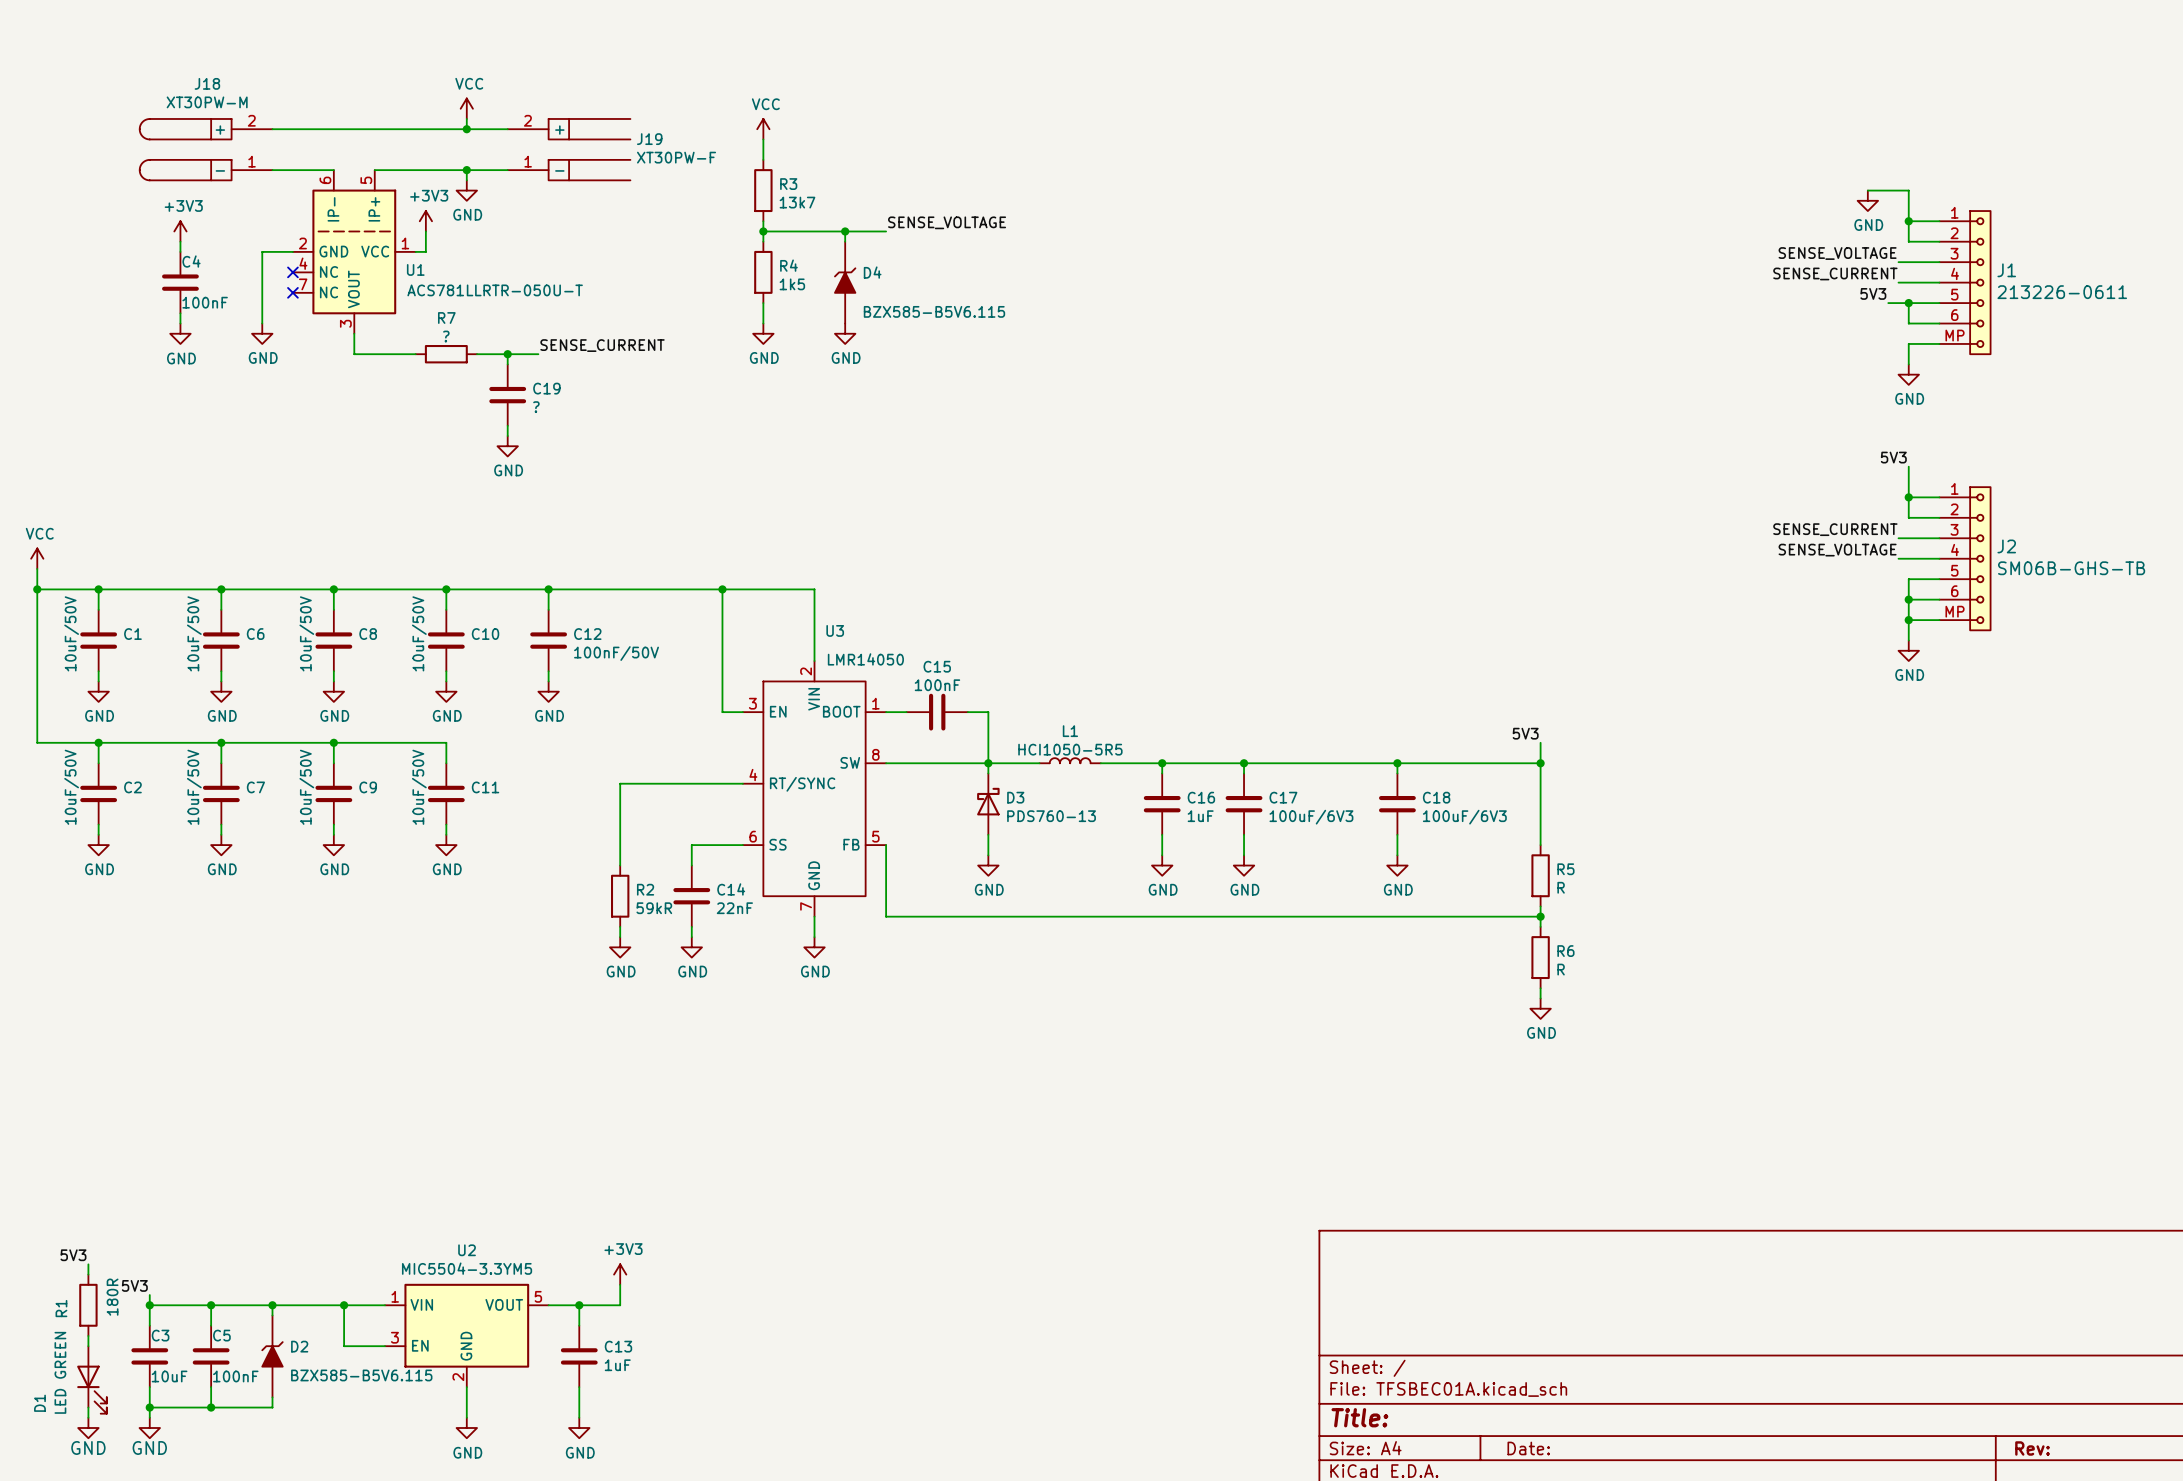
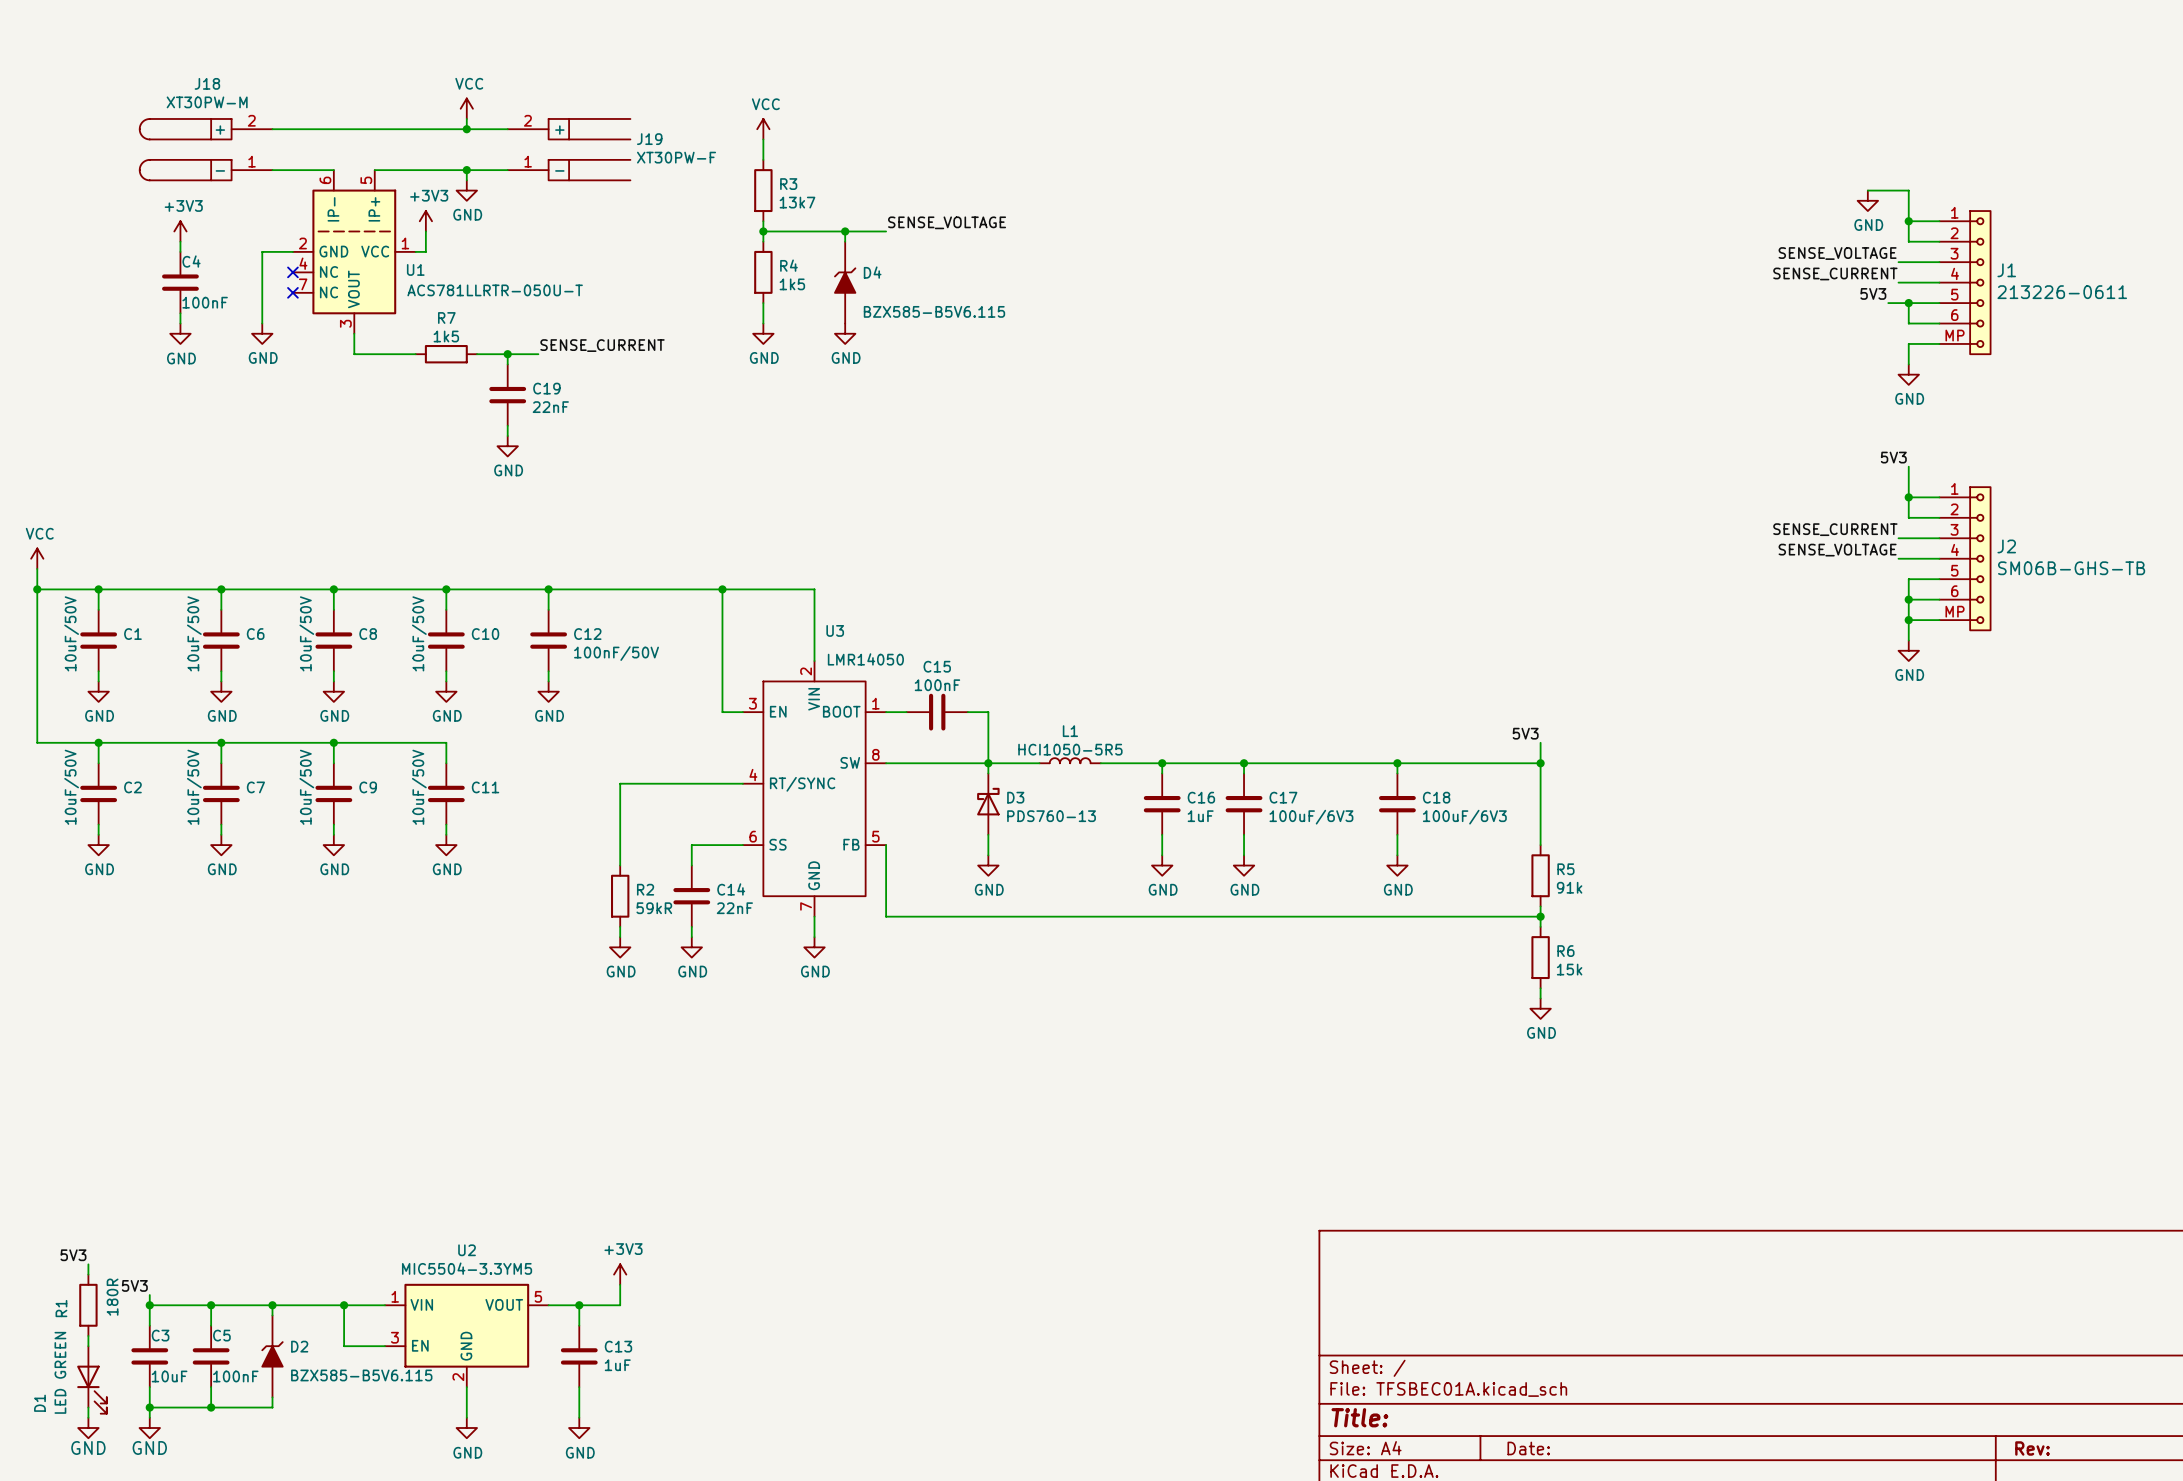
R7 value: ? (446, 336) -> 1k5 (446, 336)
C19 value: ? (536, 407) -> 22nF (550, 407)
R5 value: R (1561, 887) -> 91k (1569, 887)
R6 value: R (1561, 969) -> 15k (1569, 969)

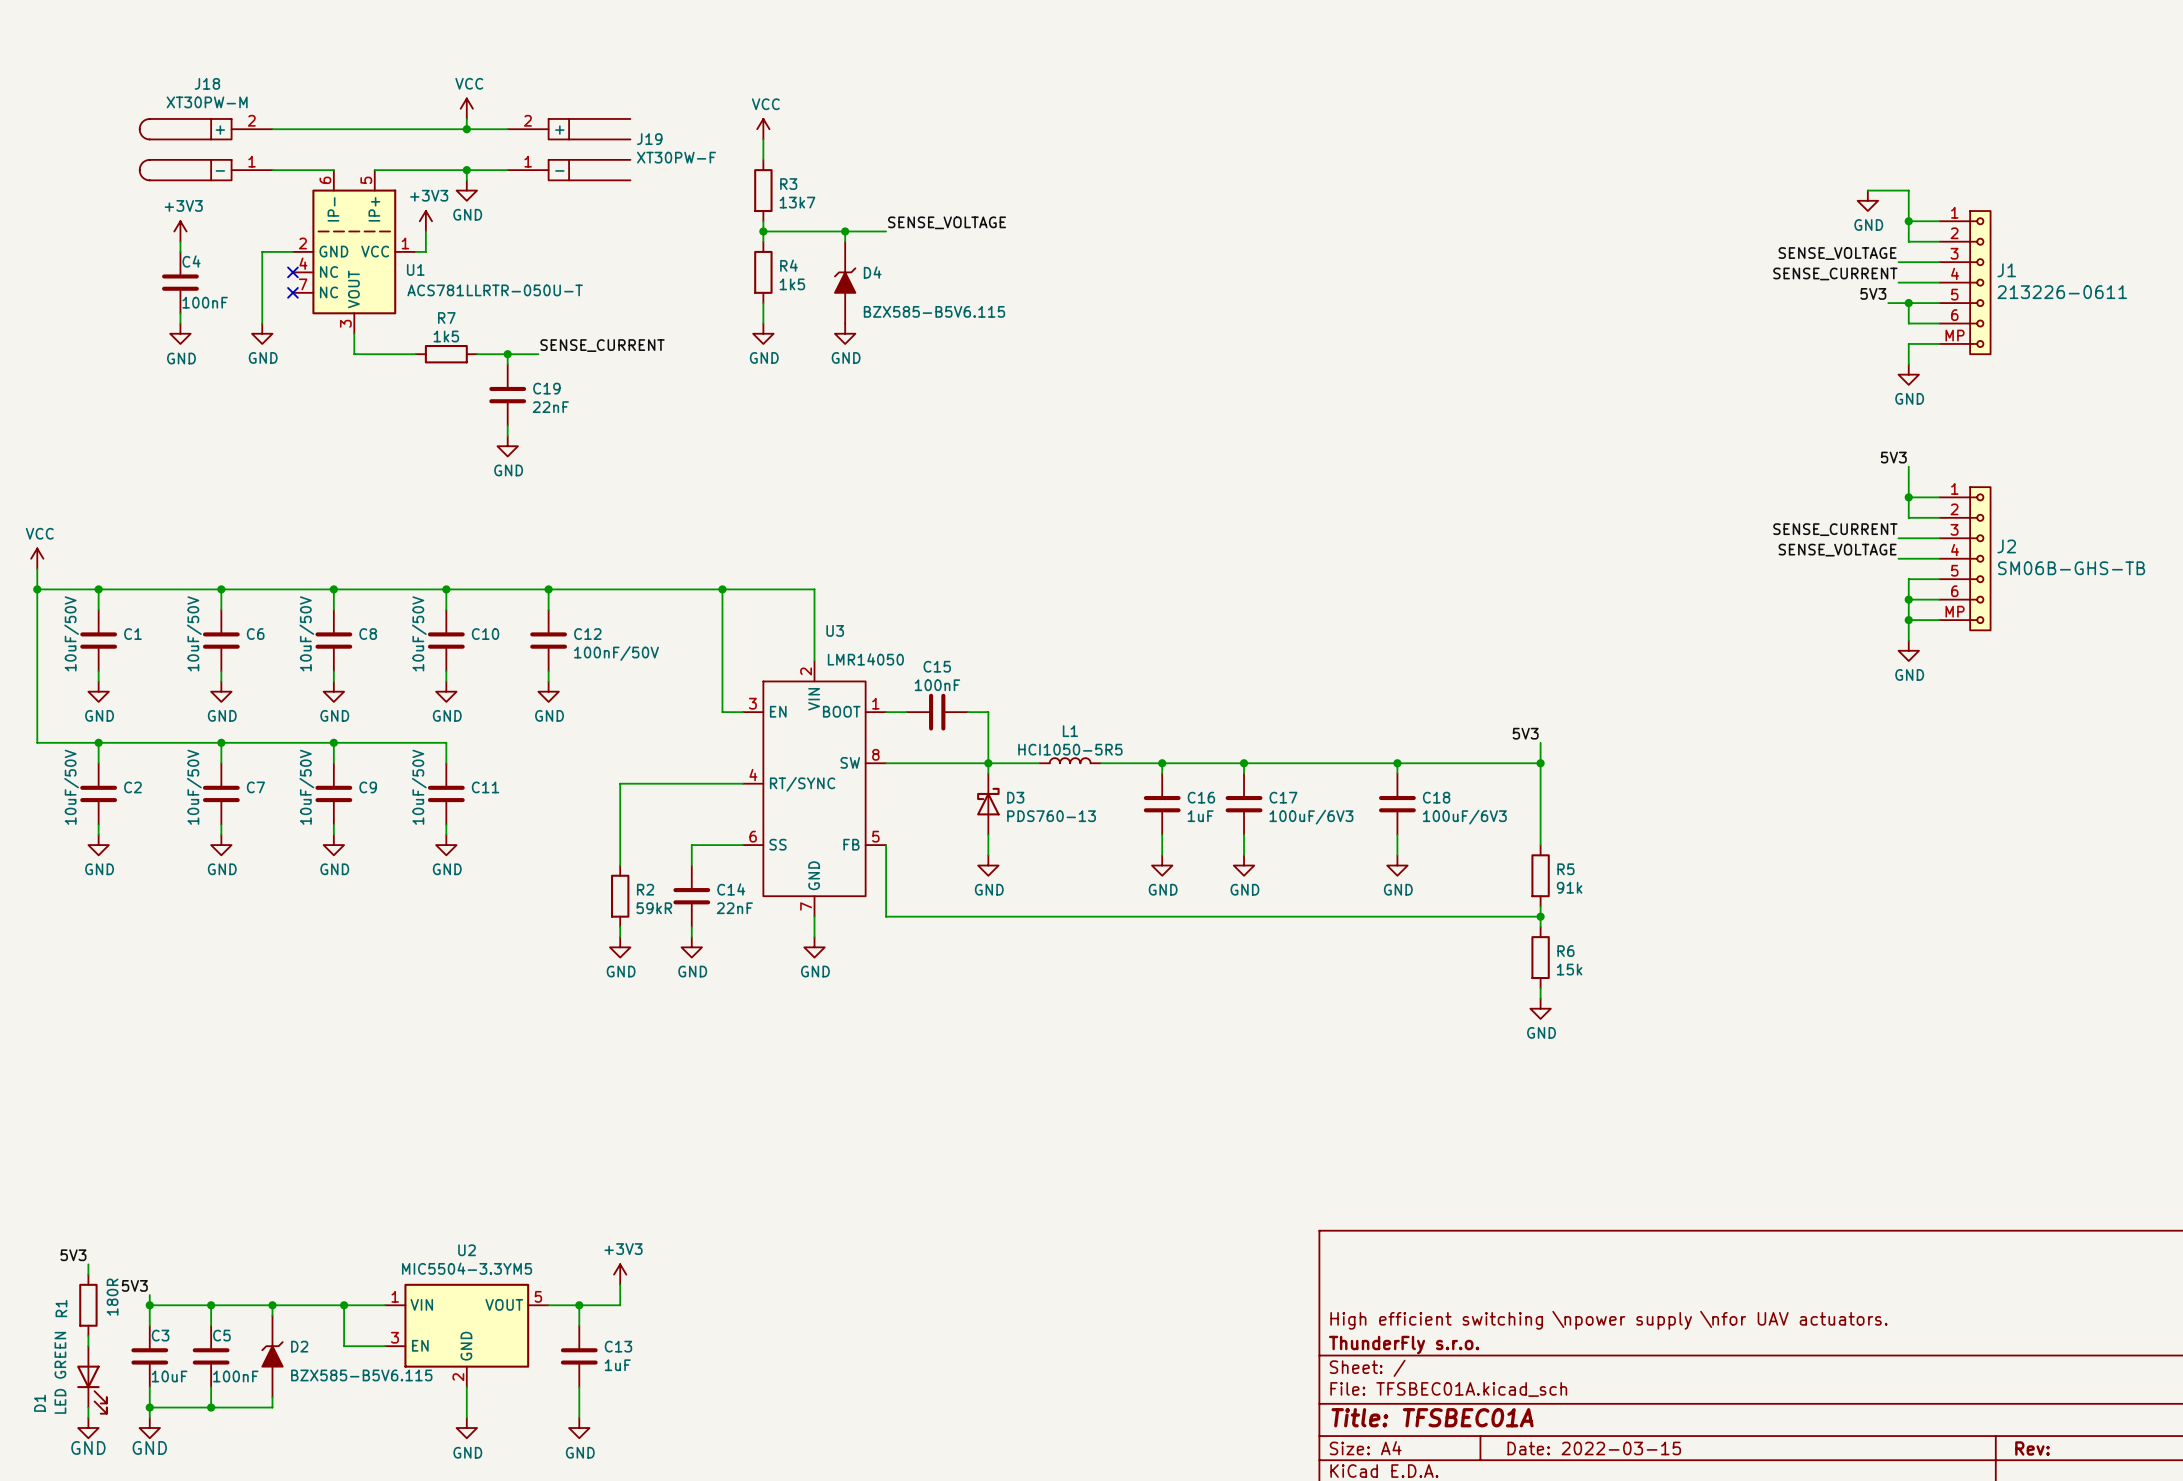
title block: none -> High efficient switching \npower supply \nfor UAV actuators. (1608, 1320)
title block: none -> ThunderFly s.r.o. (1404, 1345)
title block: Title: (1359, 1417) -> Title: TFSBEC01A (1432, 1417)
title block: Date: (1528, 1448) -> Date: 2022-03-15 (1594, 1448)

